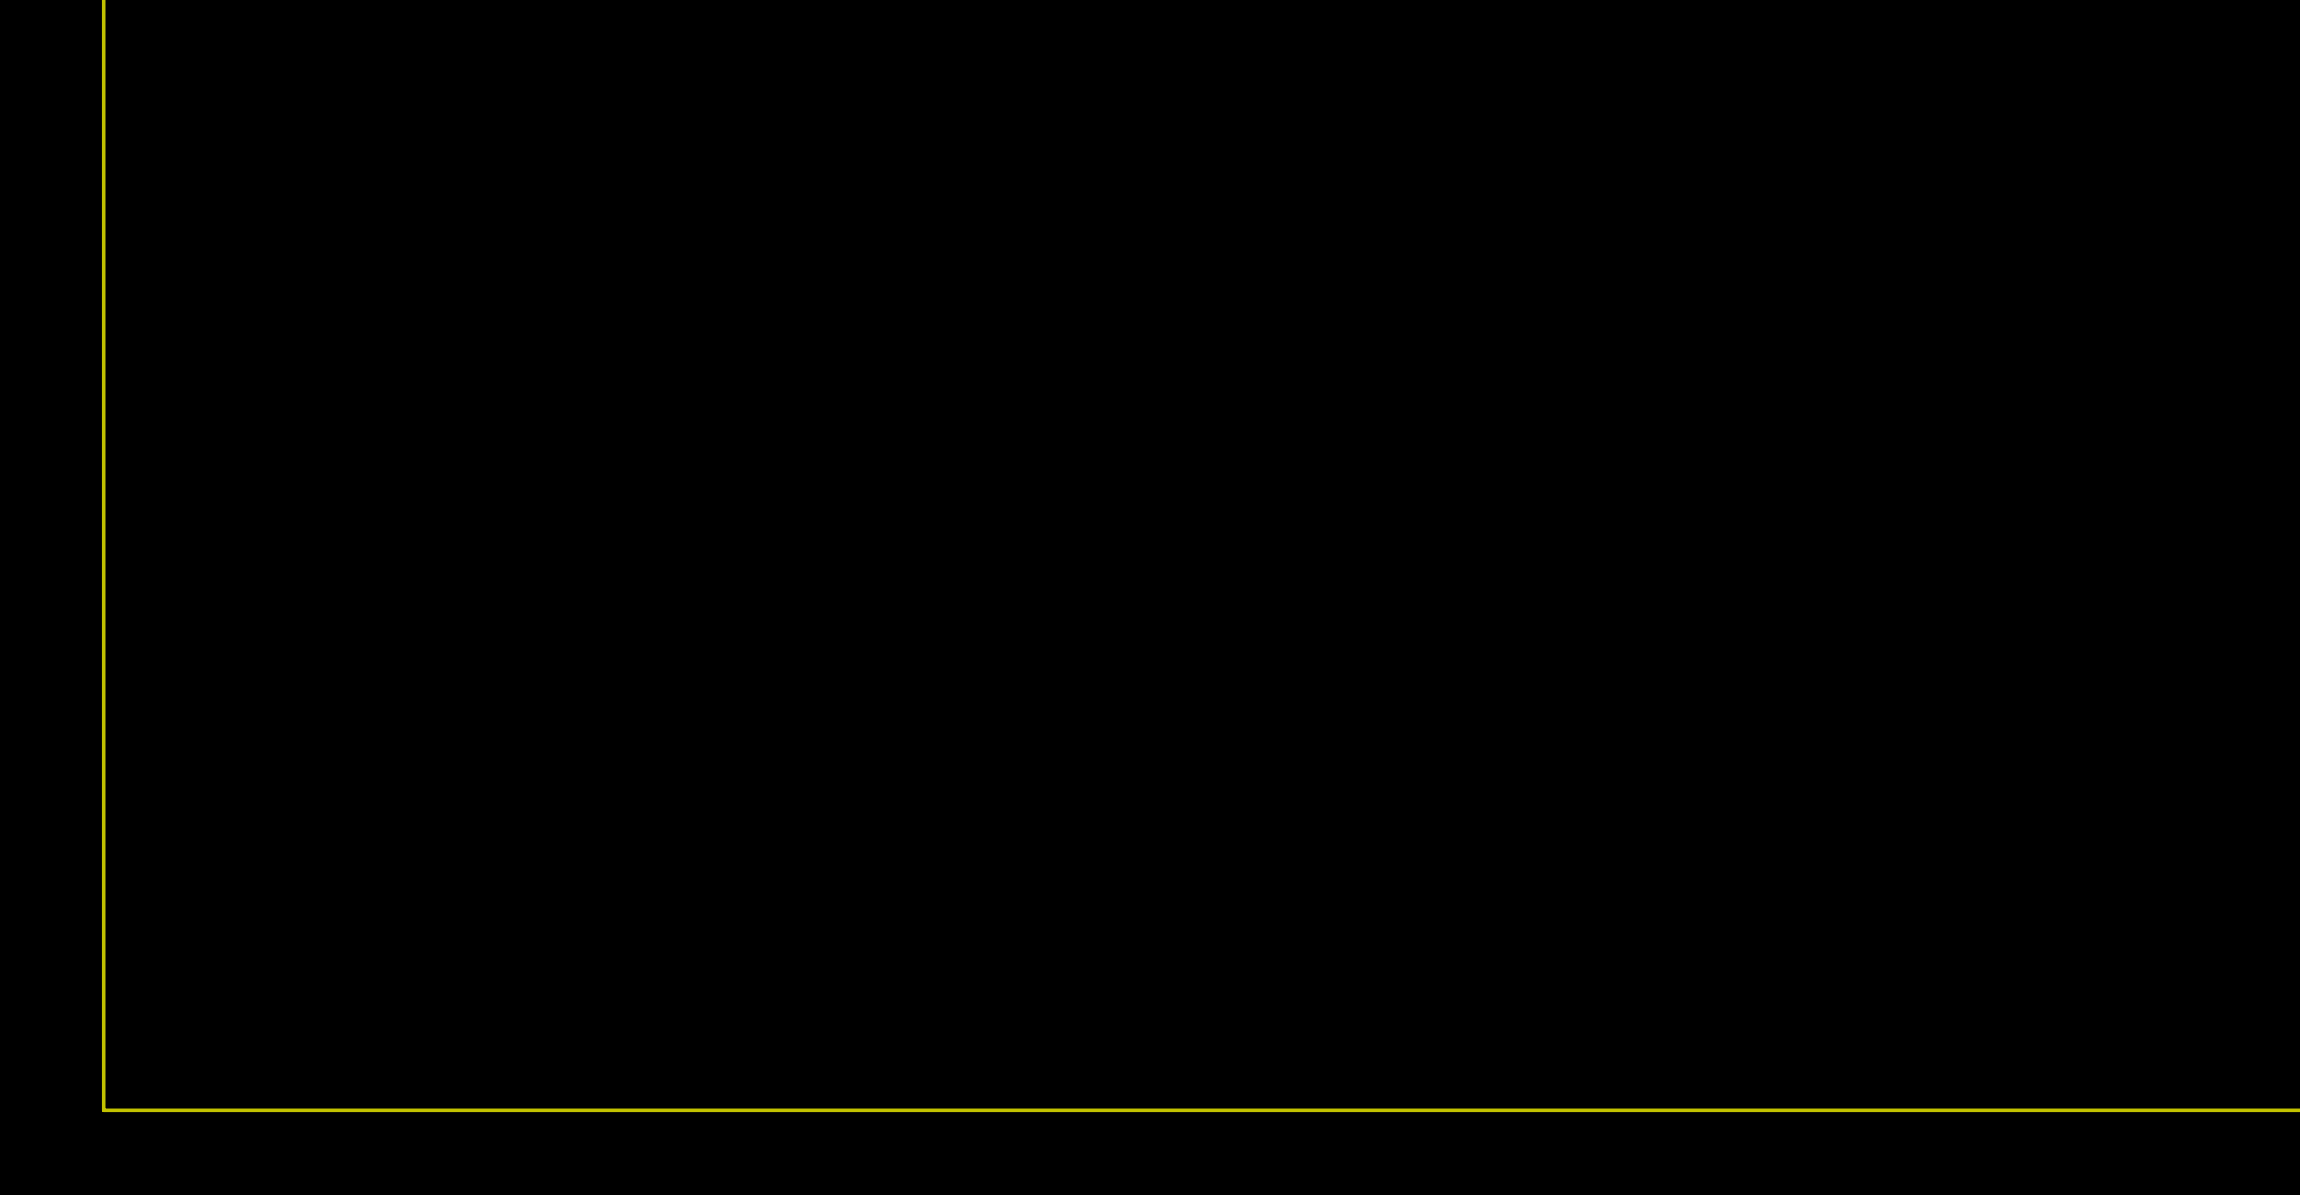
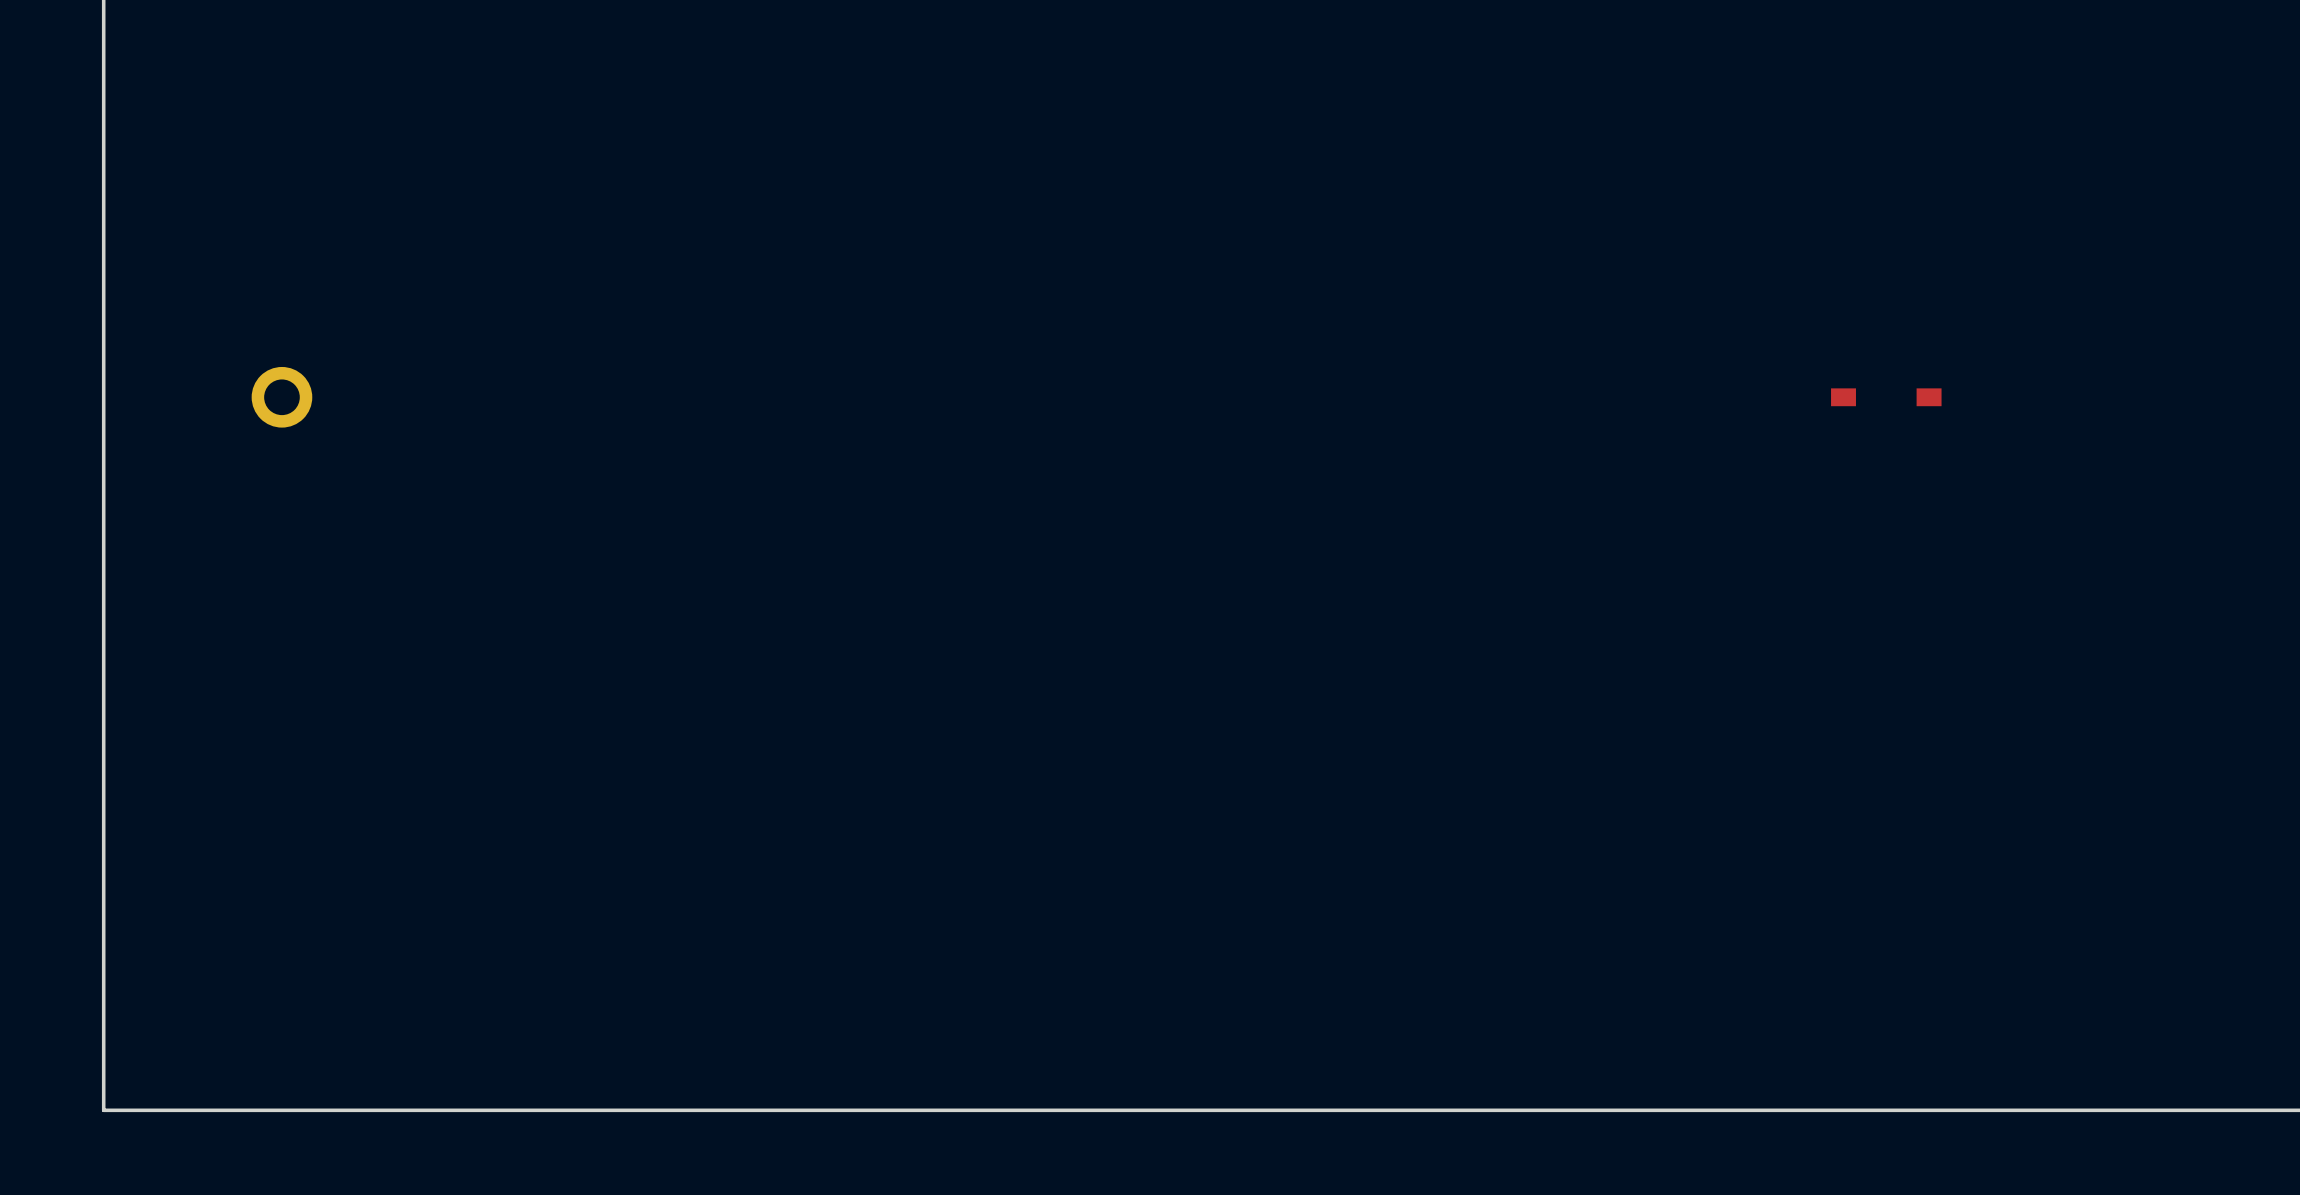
part: none -> (281, 397)
part: none -> (1886, 397)

